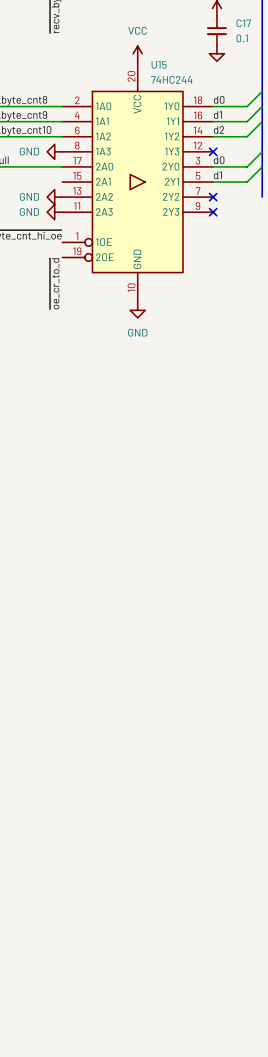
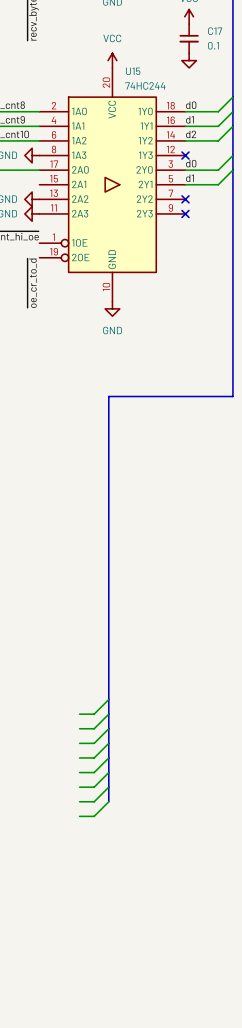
bus: none -> (232, 199) (232, 396) (108, 396) (108, 801)
wire: none -> (108, 699) (94, 714) (79, 714)
wire: none -> (108, 714) (94, 728) (79, 728)
wire: none -> (108, 728) (94, 743) (79, 743)
wire: none -> (108, 743) (94, 757) (79, 757)
wire: none -> (108, 757) (94, 772) (79, 772)
wire: none -> (108, 772) (94, 787) (79, 787)
wire: none -> (108, 787) (94, 801) (79, 801)
wire: none -> (108, 801) (94, 816) (79, 816)

